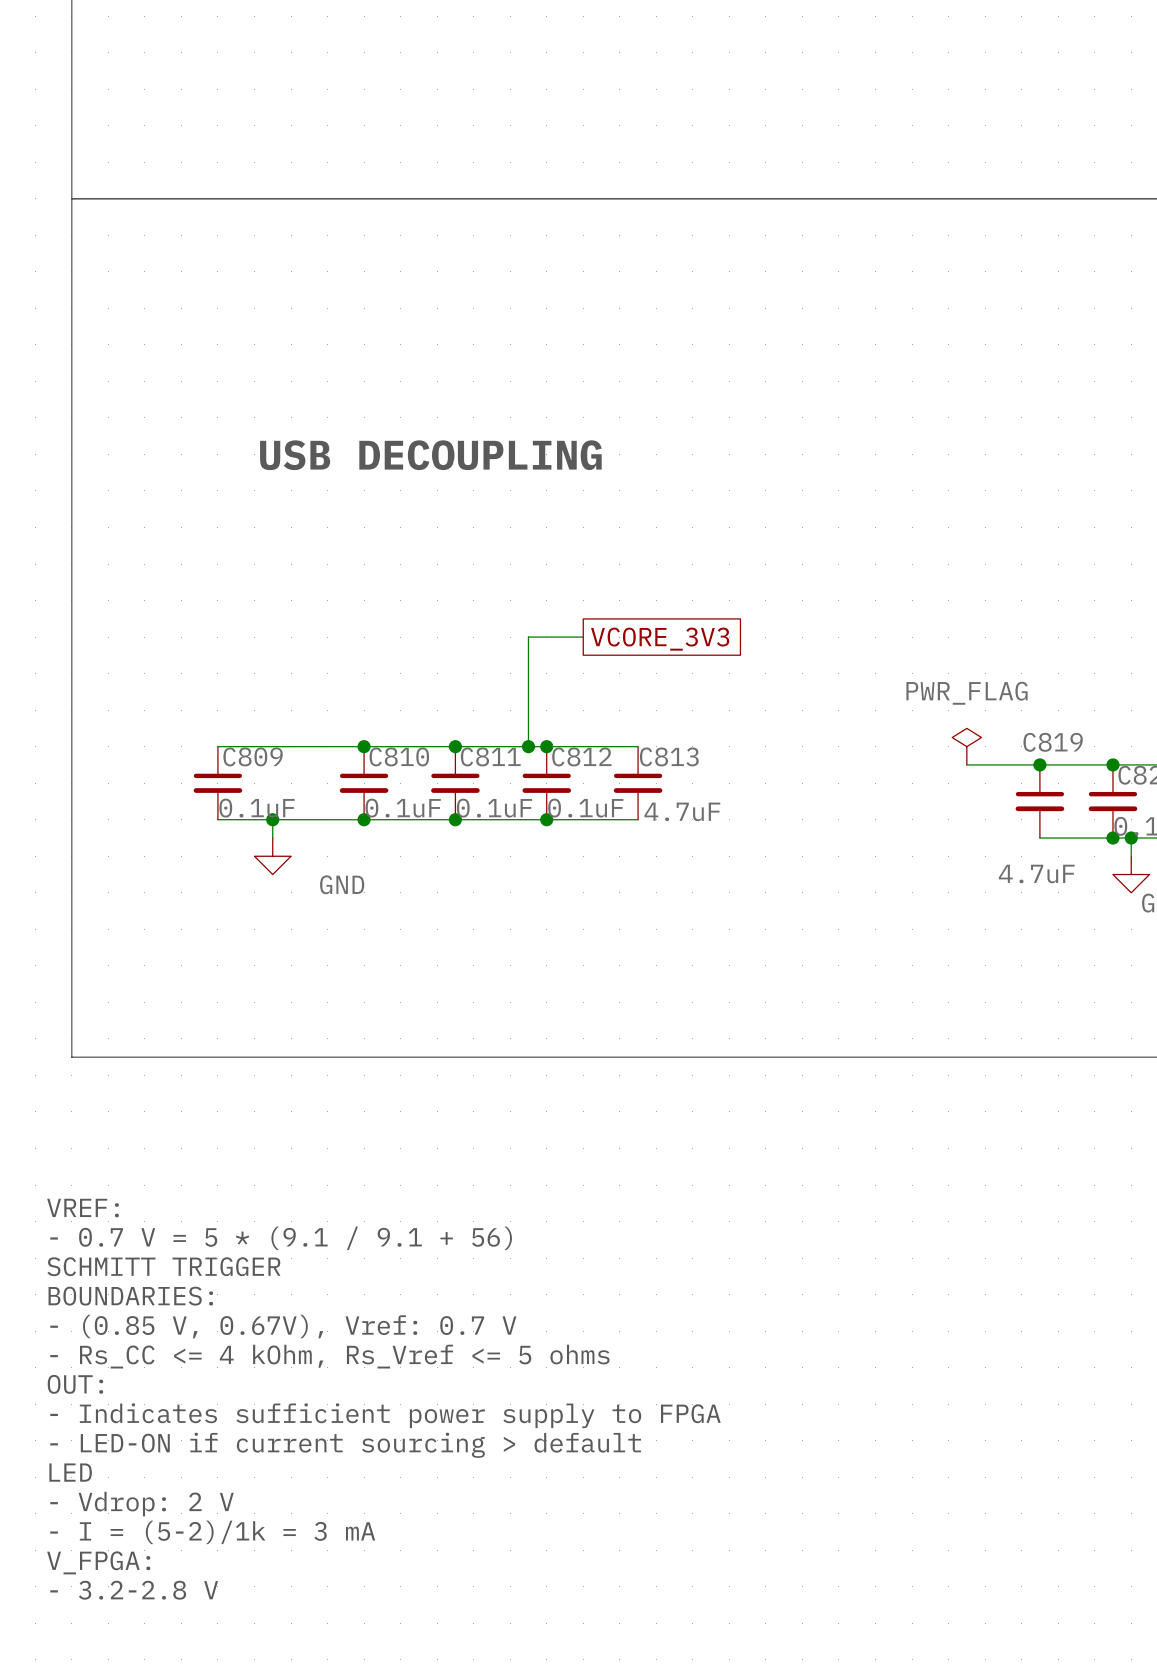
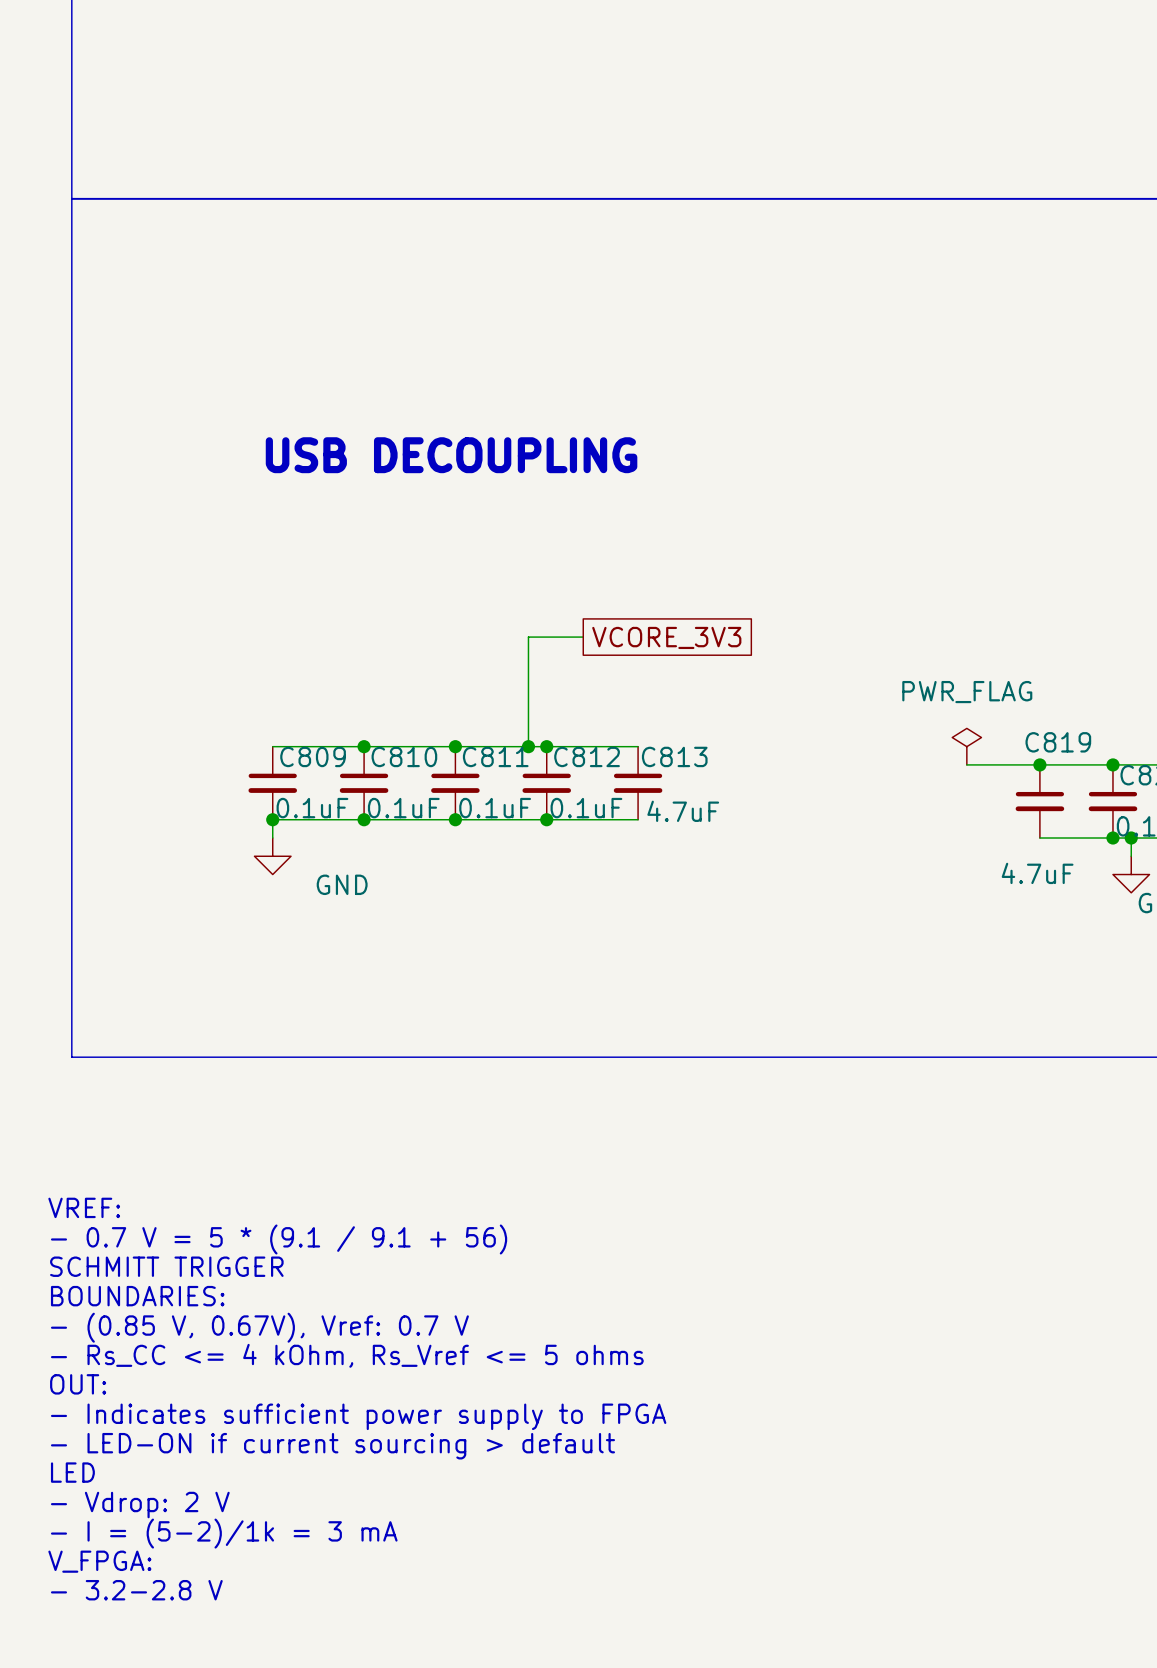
wire: (217, 746) (272, 746) -> none
C809 position: (217, 783) -> (272, 783)
wire: (217, 819) (272, 819) -> none

